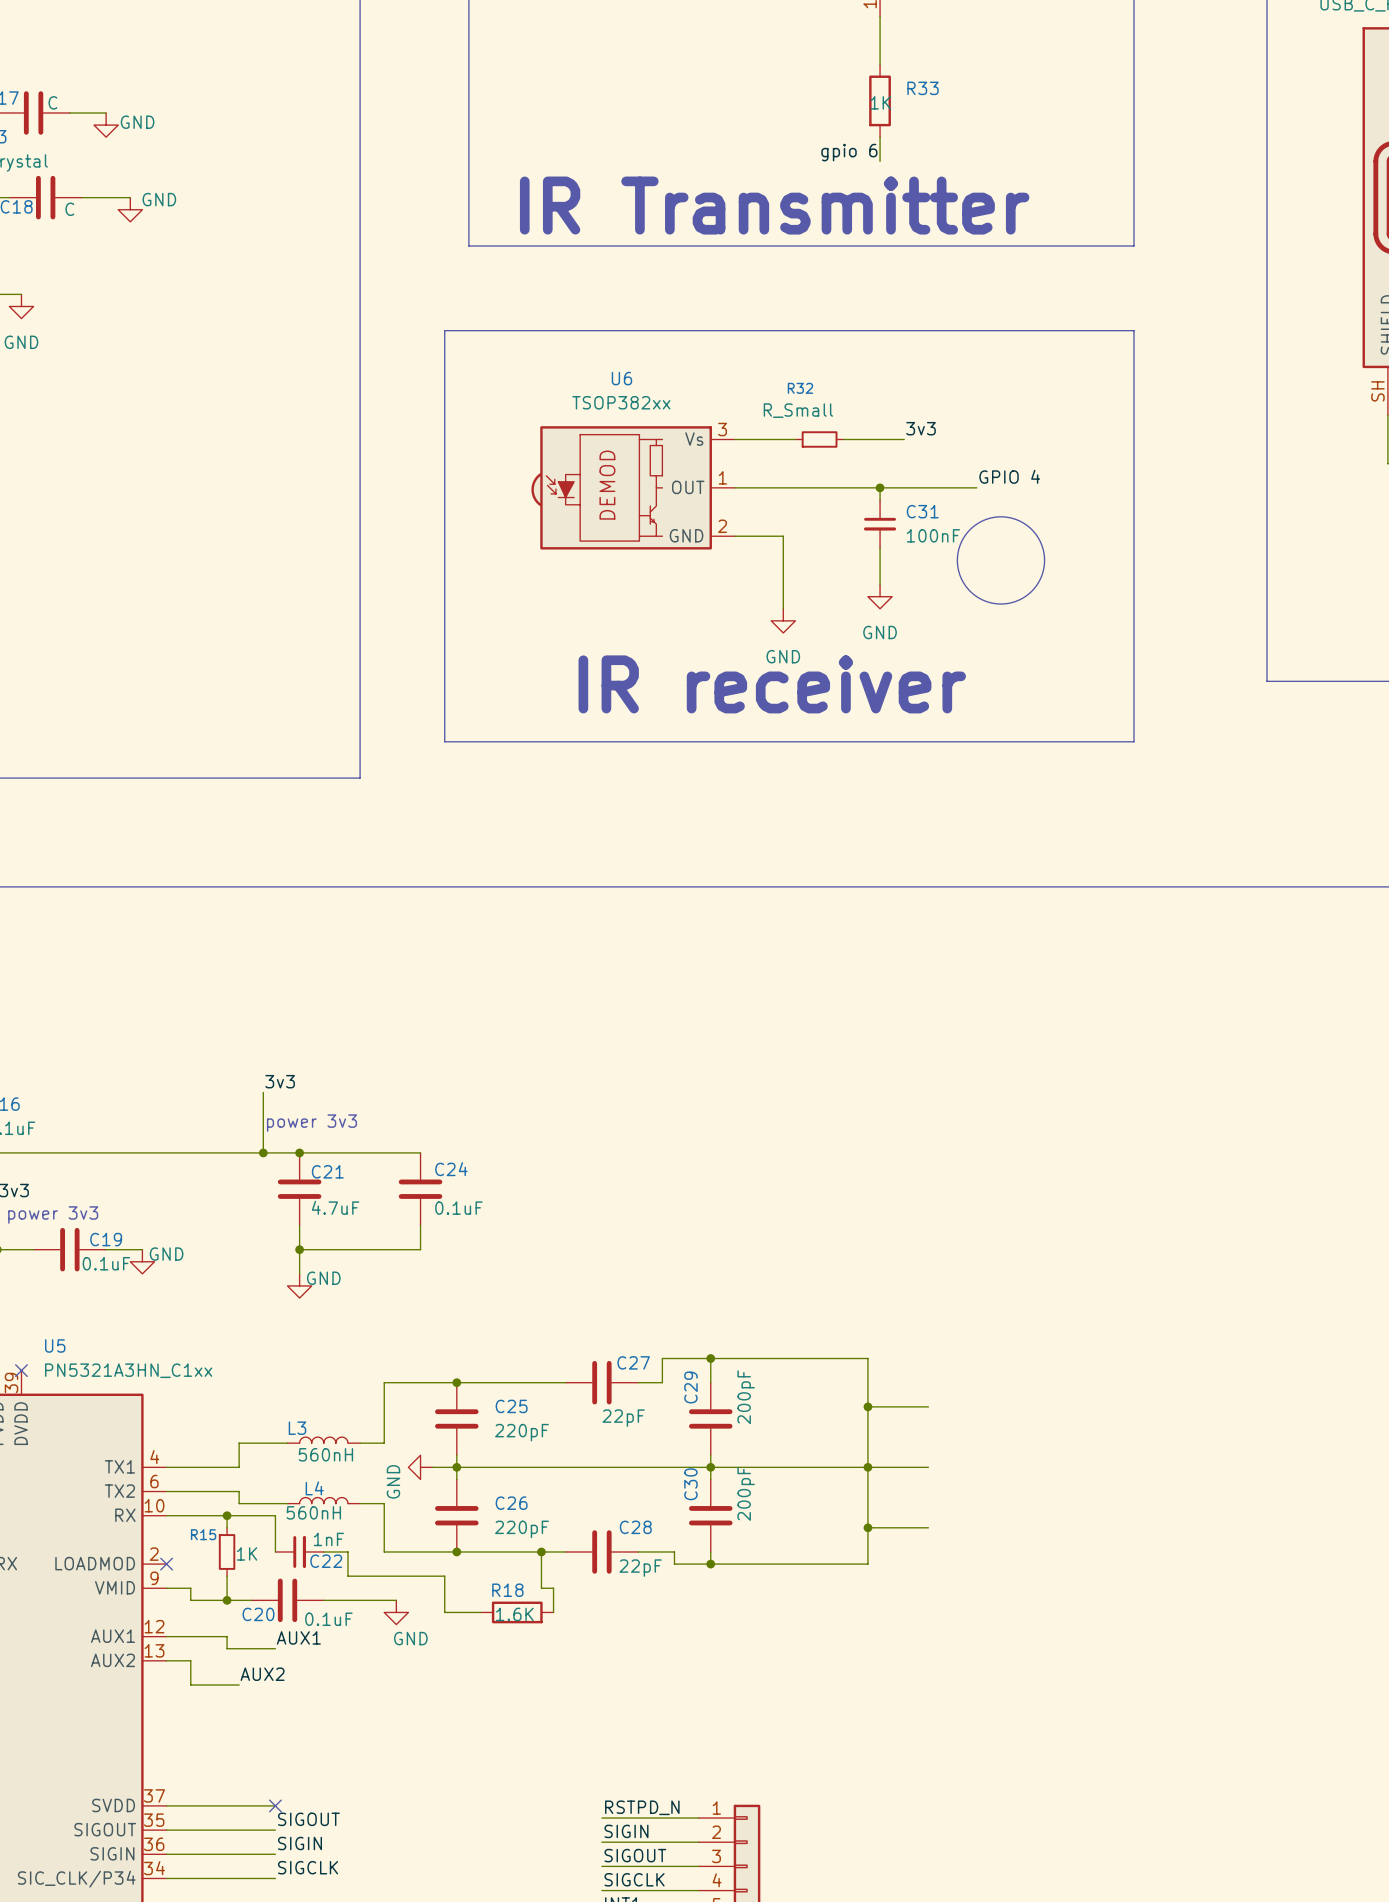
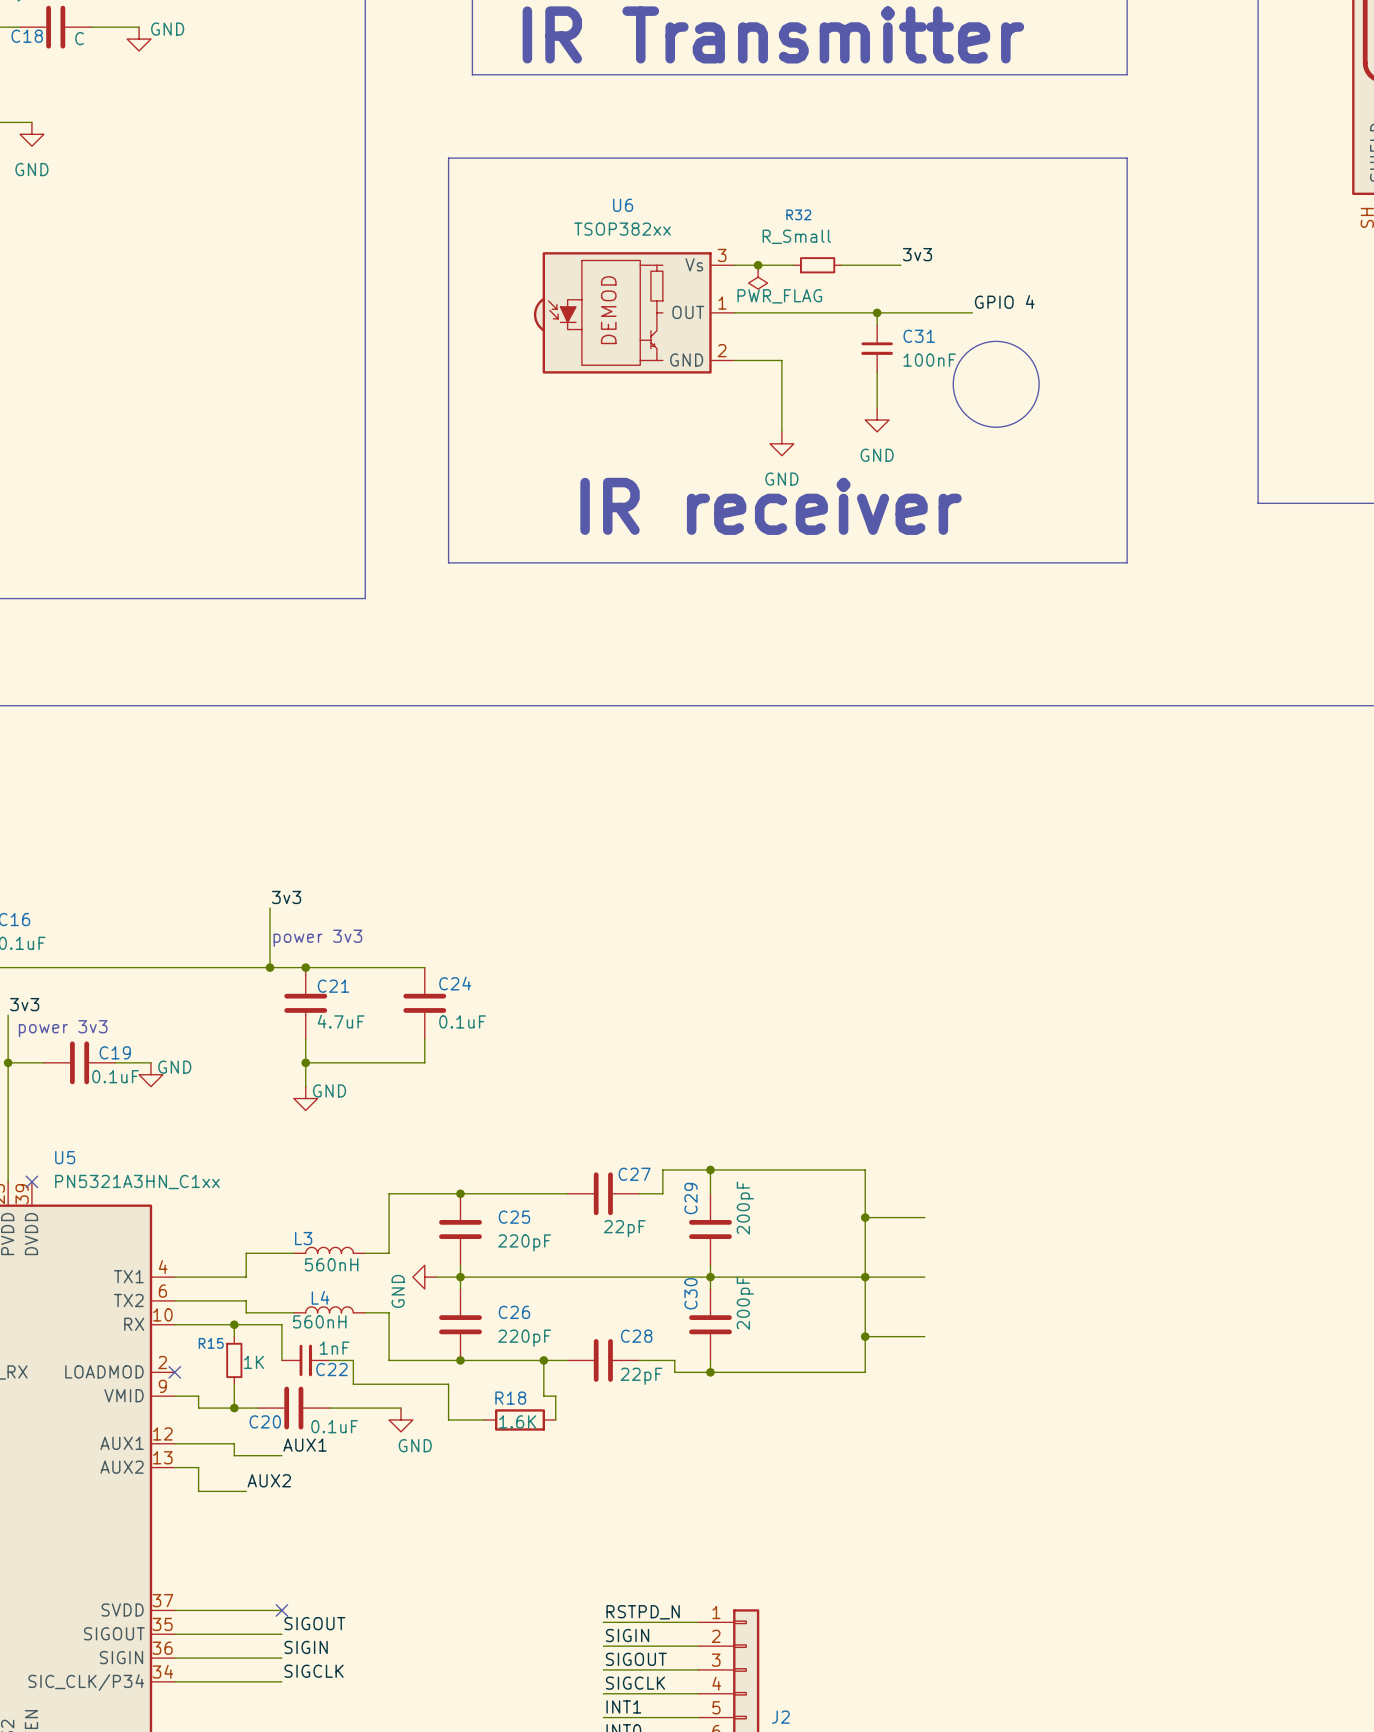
junction: none -> (758, 265)
power symbol: none -> PWR_FLAG (758, 277)

